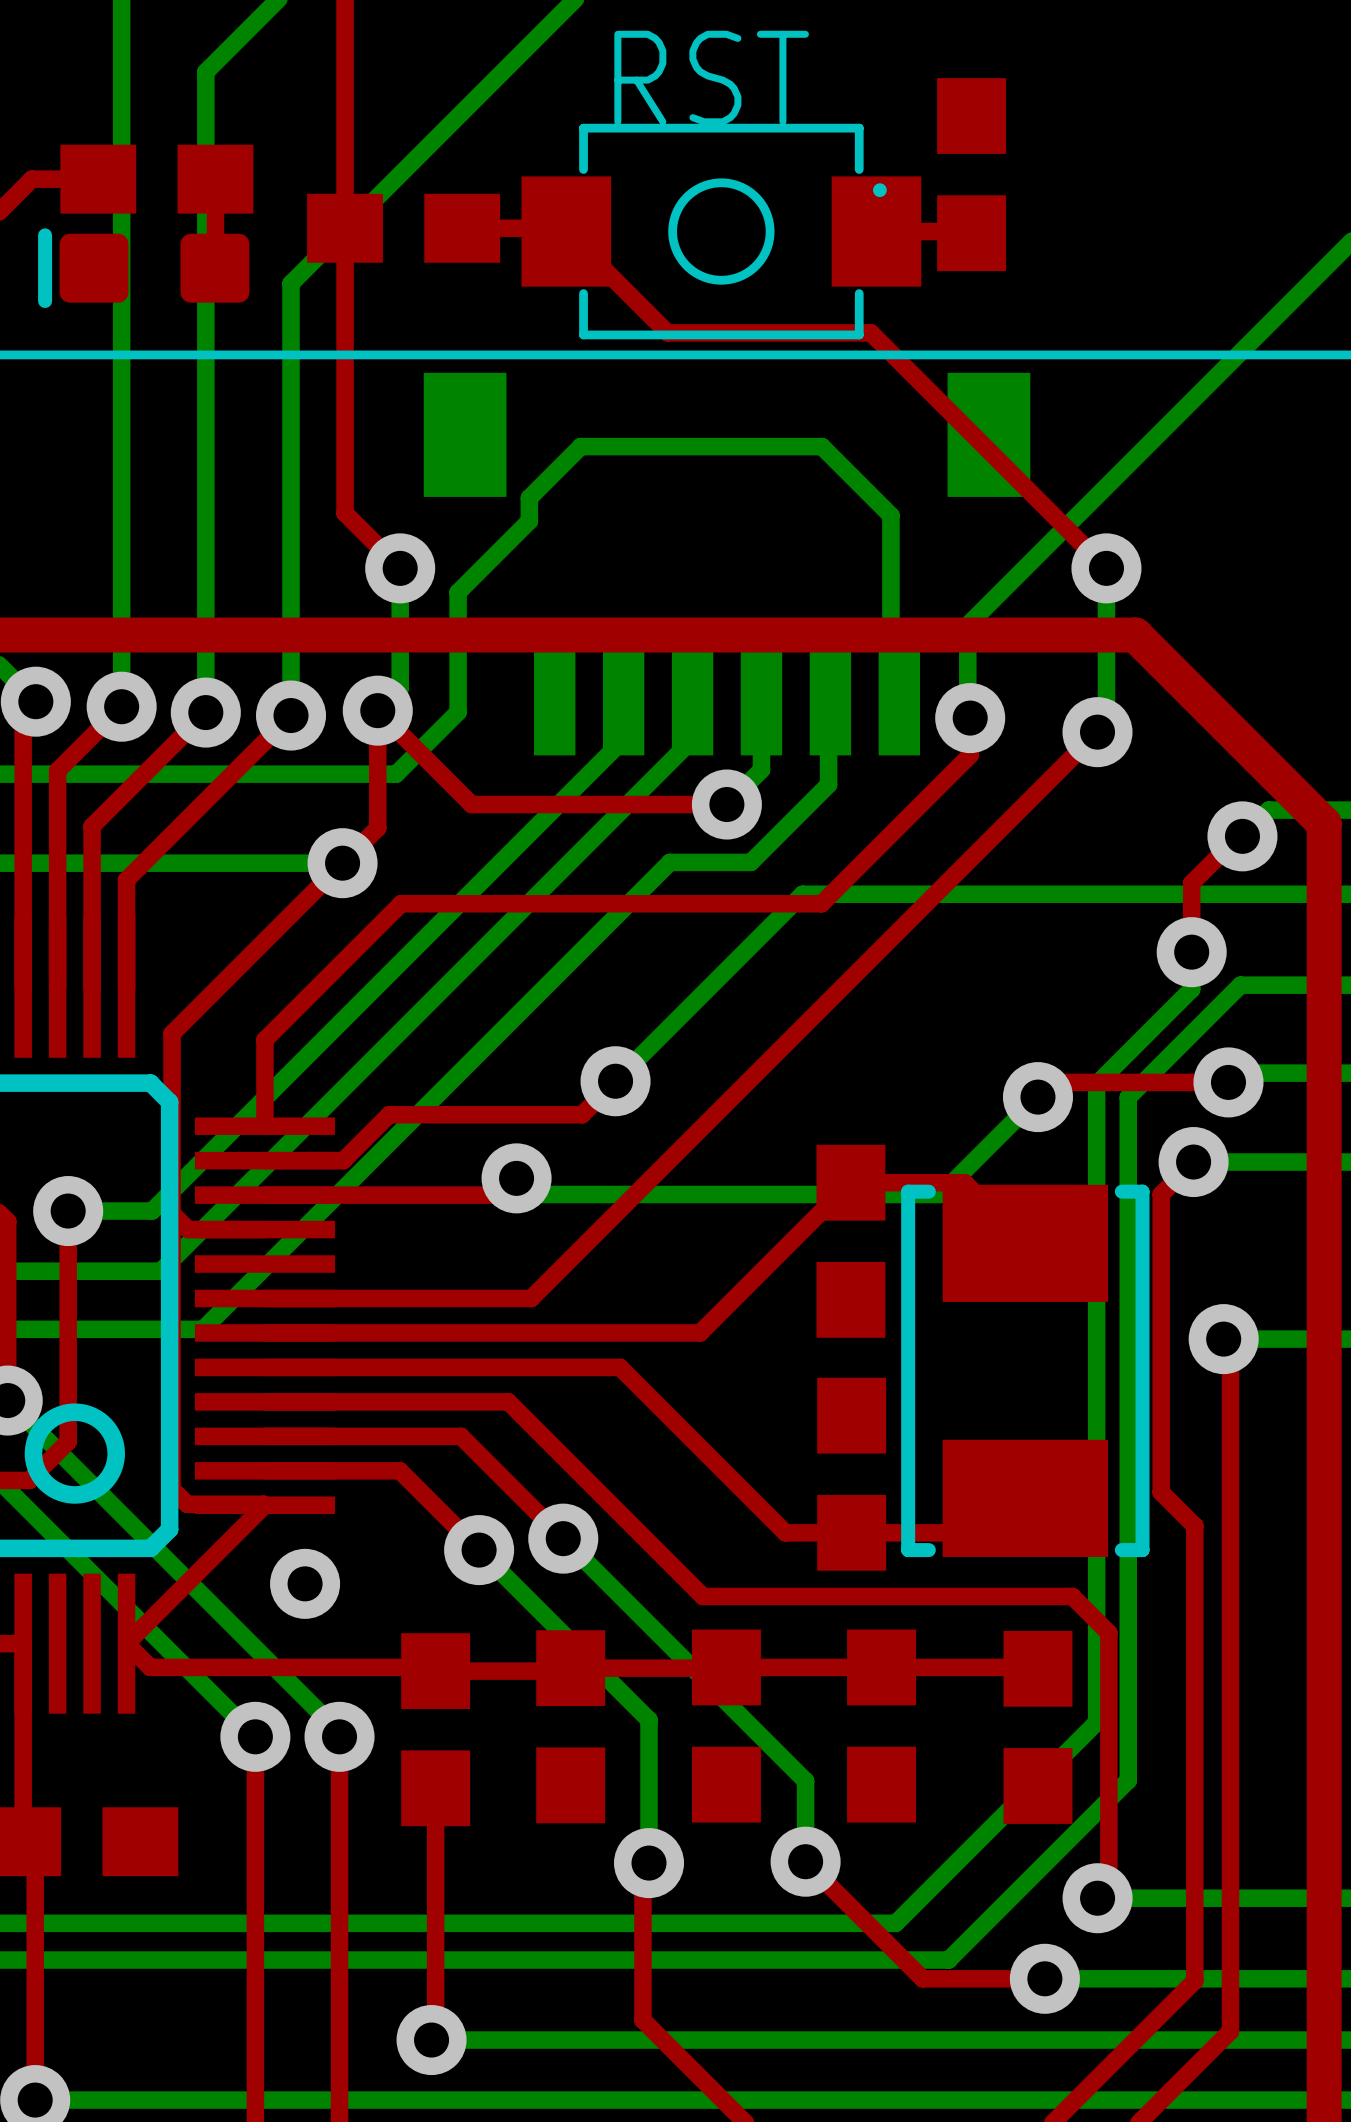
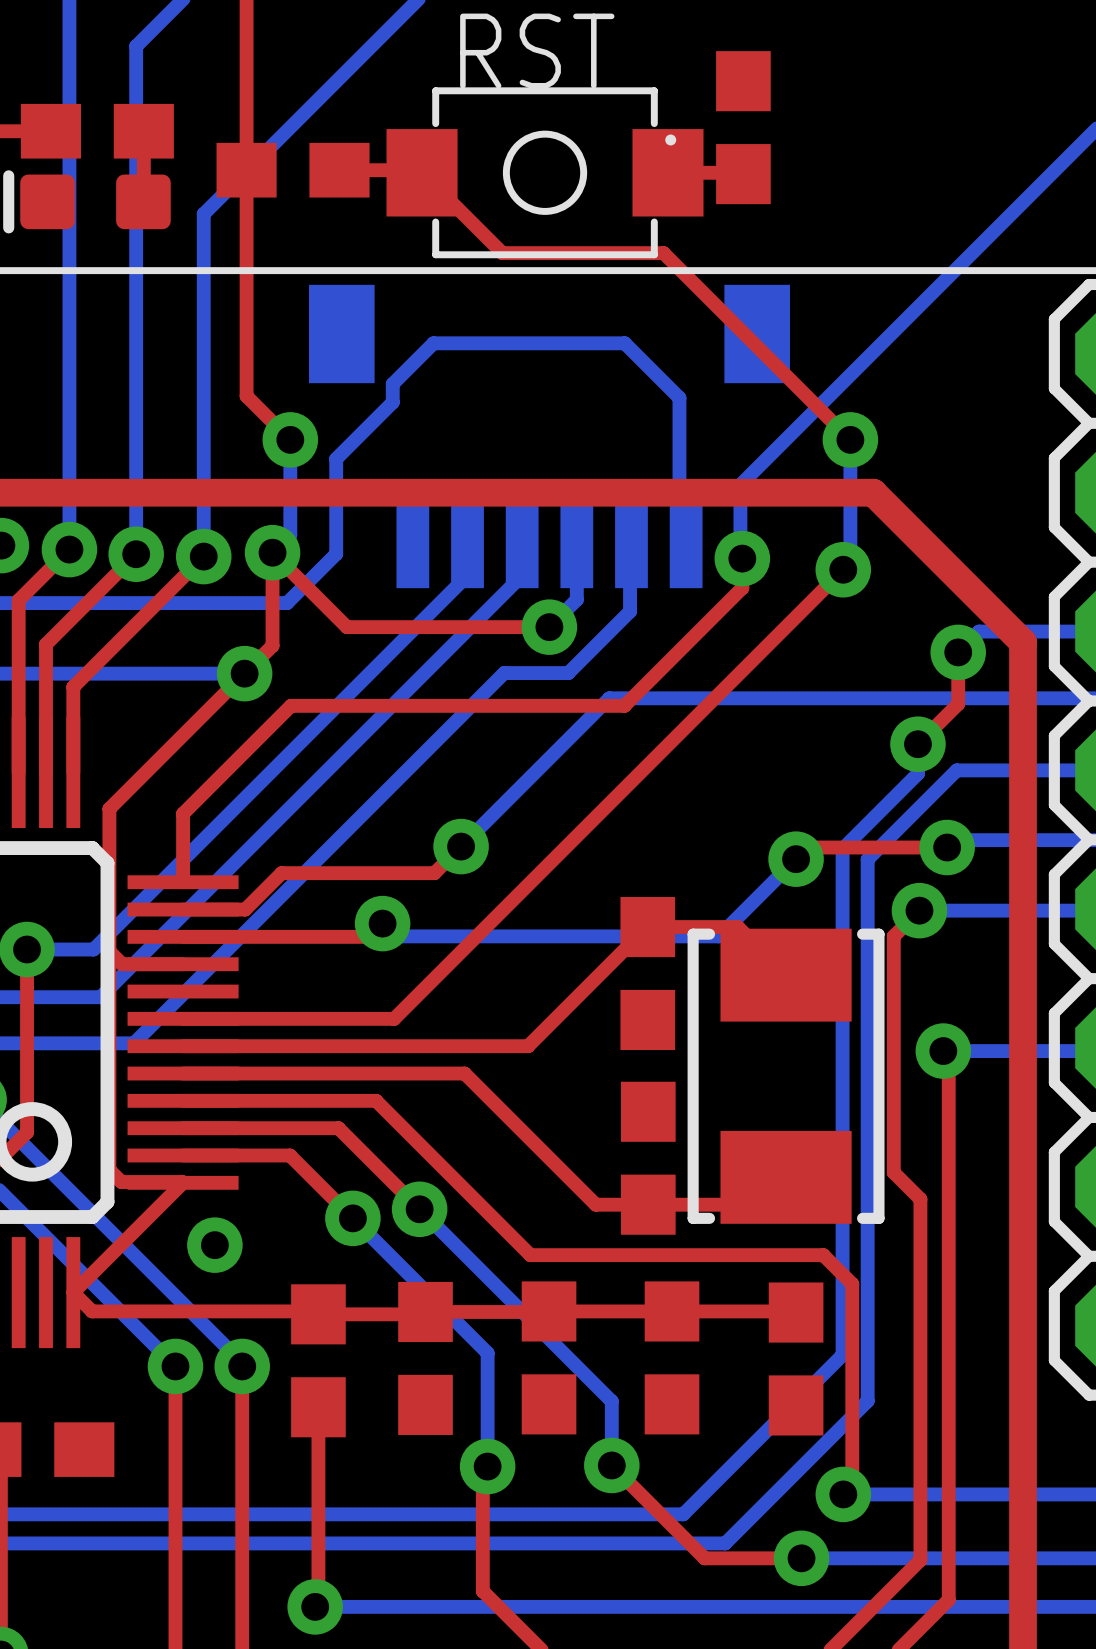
top track: (1242, 836) (1238, 836) (1191, 883) (1191, 952) -> (958, 652) (958, 703) (917, 744)

